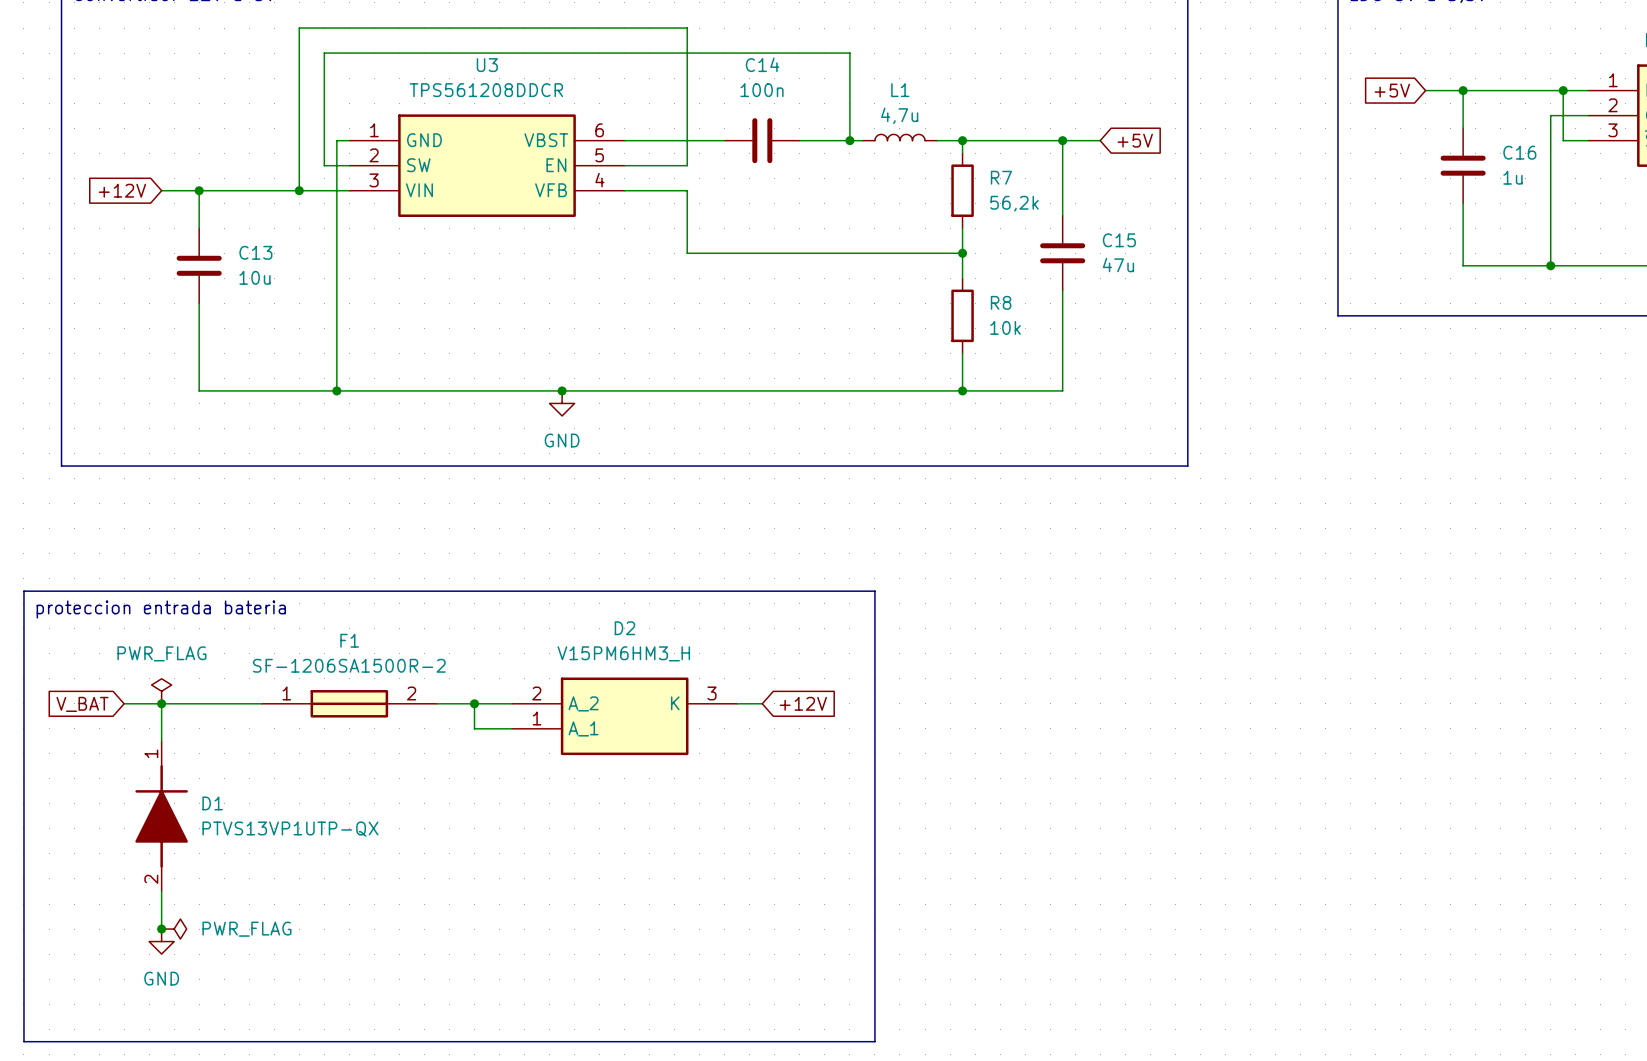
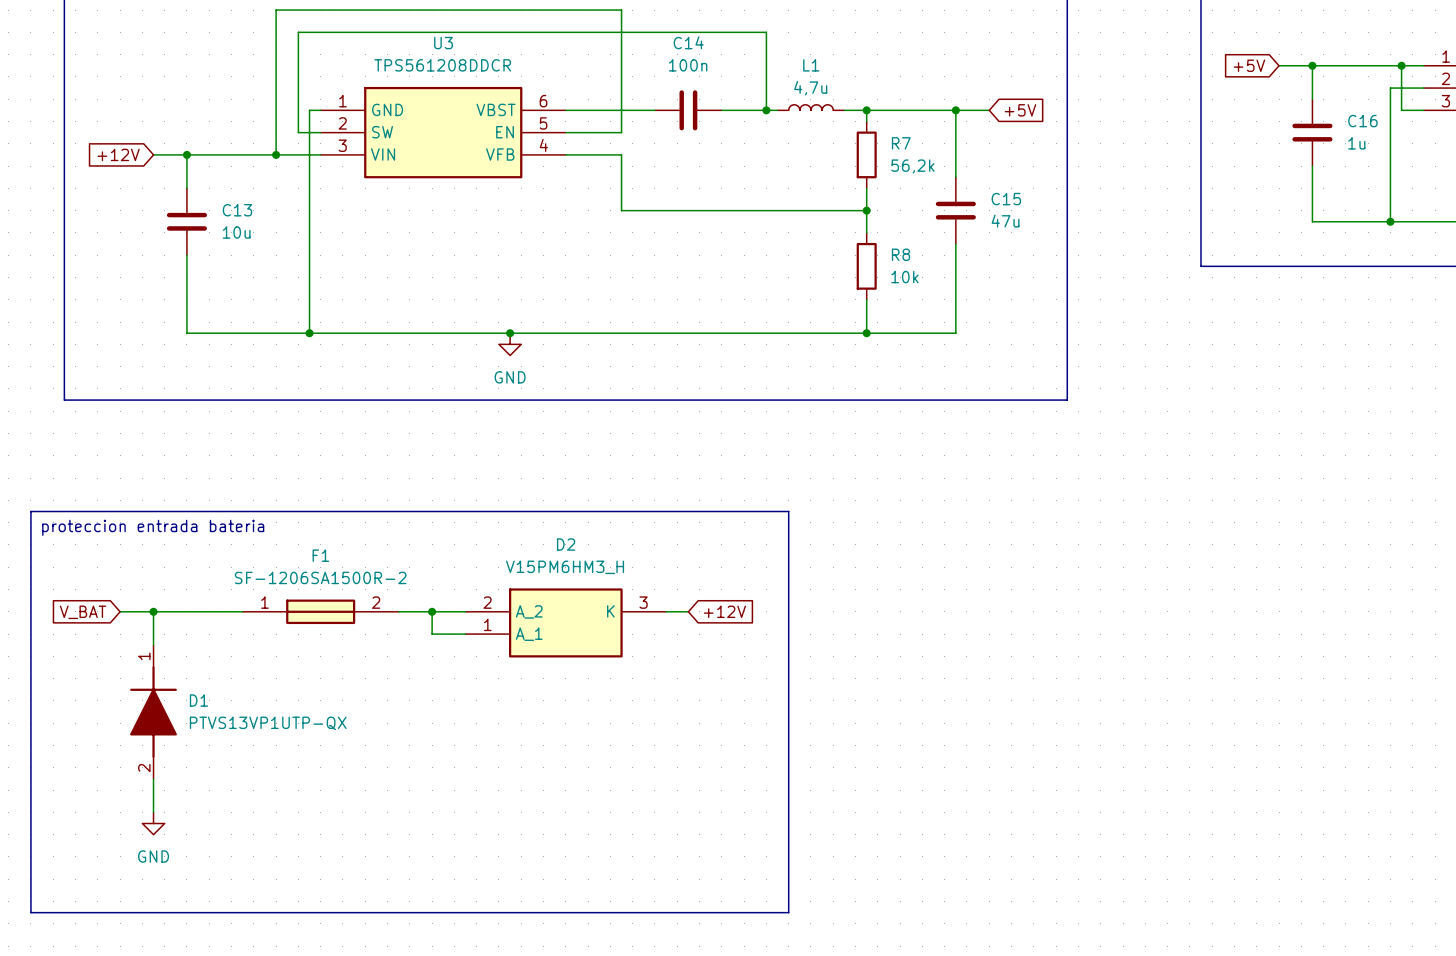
power symbol: PWR_FLAG (161, 691) -> none
junction: (161, 929) -> none
power symbol: PWR_FLAG (174, 929) -> none

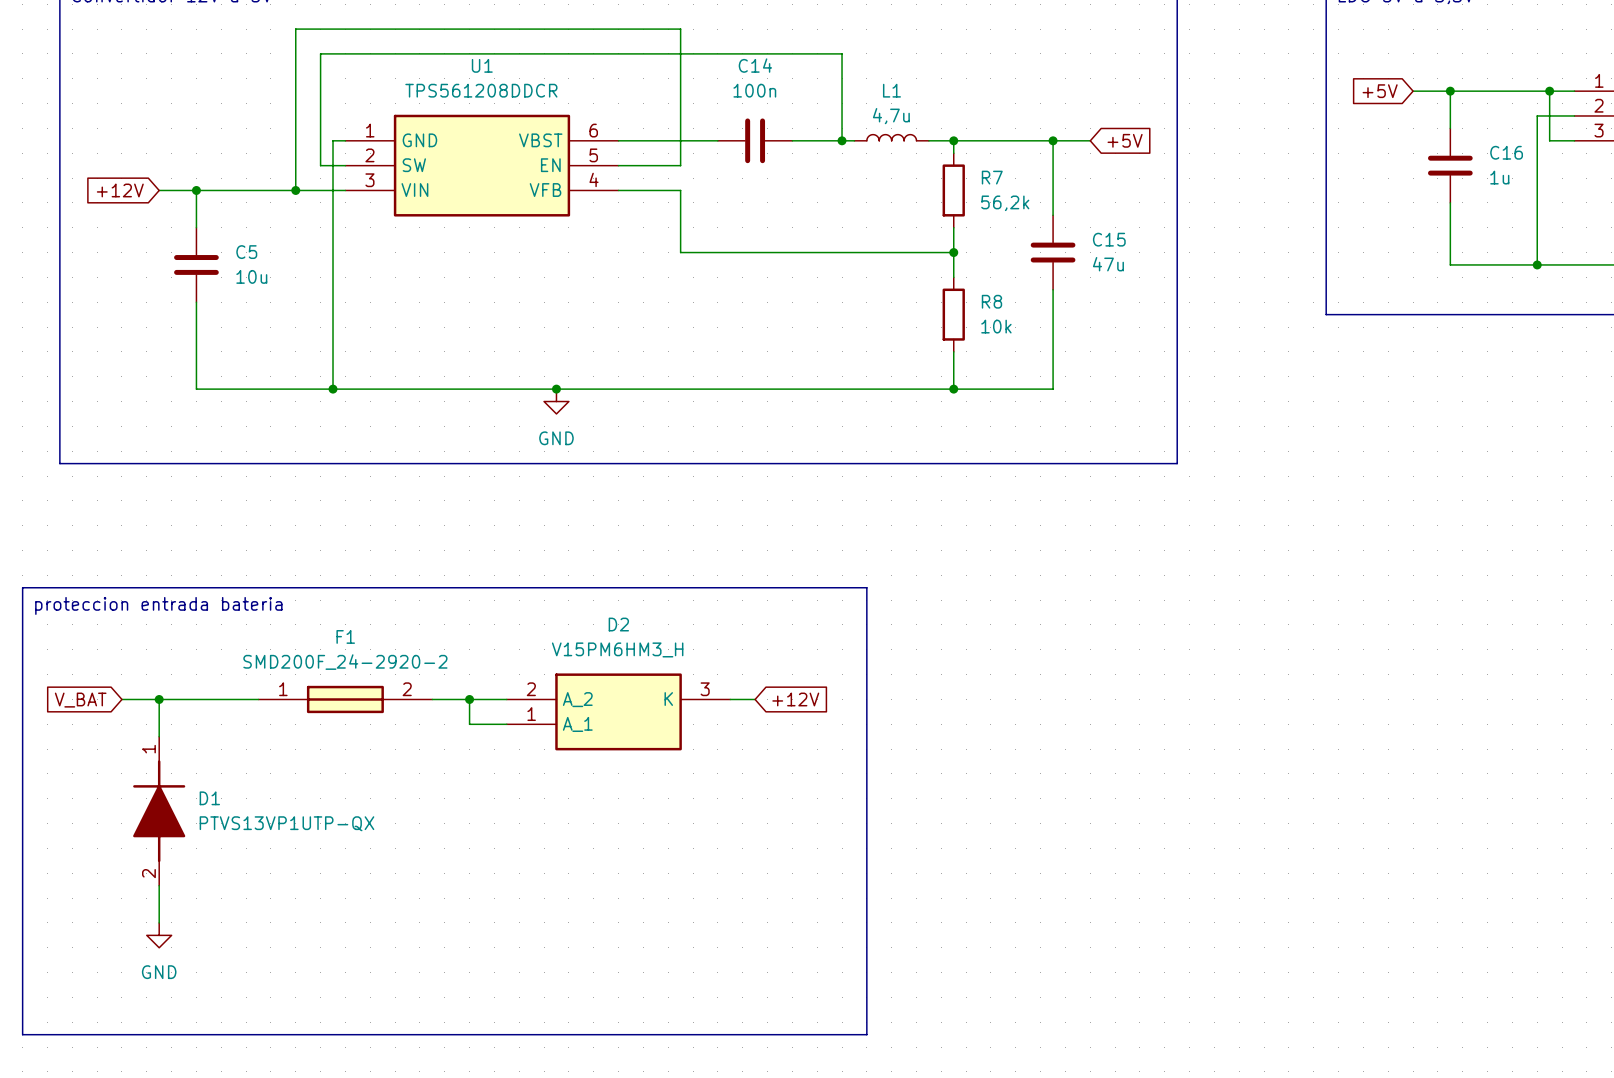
U3 name: U3 (443, 43) -> U1 (482, 65)
C13 name: C13 (237, 210) -> C5 (246, 252)
F1 value: SF-1206SA1500R-2 (320, 577) -> SMD200F_24-2920-2 (345, 662)

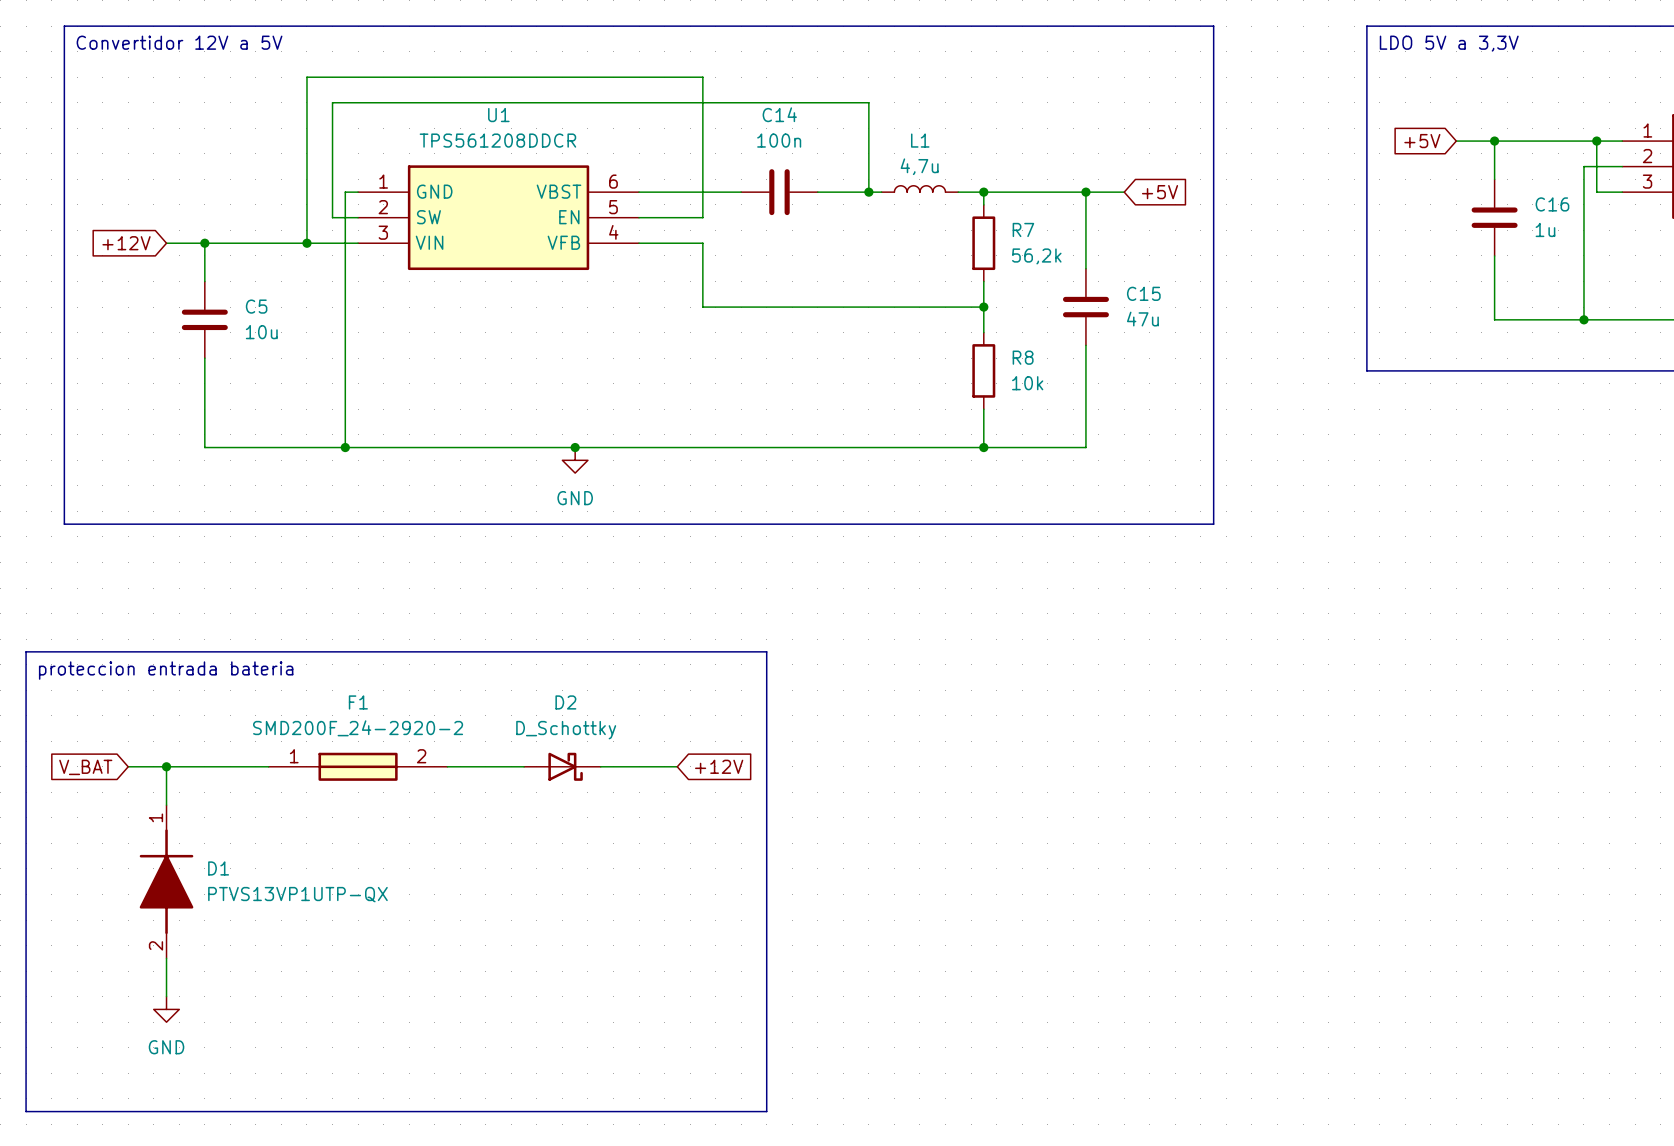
line: (742, 587) (866, 587) (866, 1034) (742, 1034) -> (766, 651) (766, 1111)
D2 name position: D2 (618, 624) -> D2 (565, 702)
D2 value: V15PM6HM3_H (617, 649) -> D_Schottky (566, 730)
D2 symbol: [506, 673, 731, 751] -> [524, 752, 601, 781]
wire: (469, 699) (469, 724) (506, 724) -> none
junction: (469, 699) -> none
wire: (730, 699) (755, 699) -> none
global label position: +12V (795, 699) -> +12V (719, 766)

